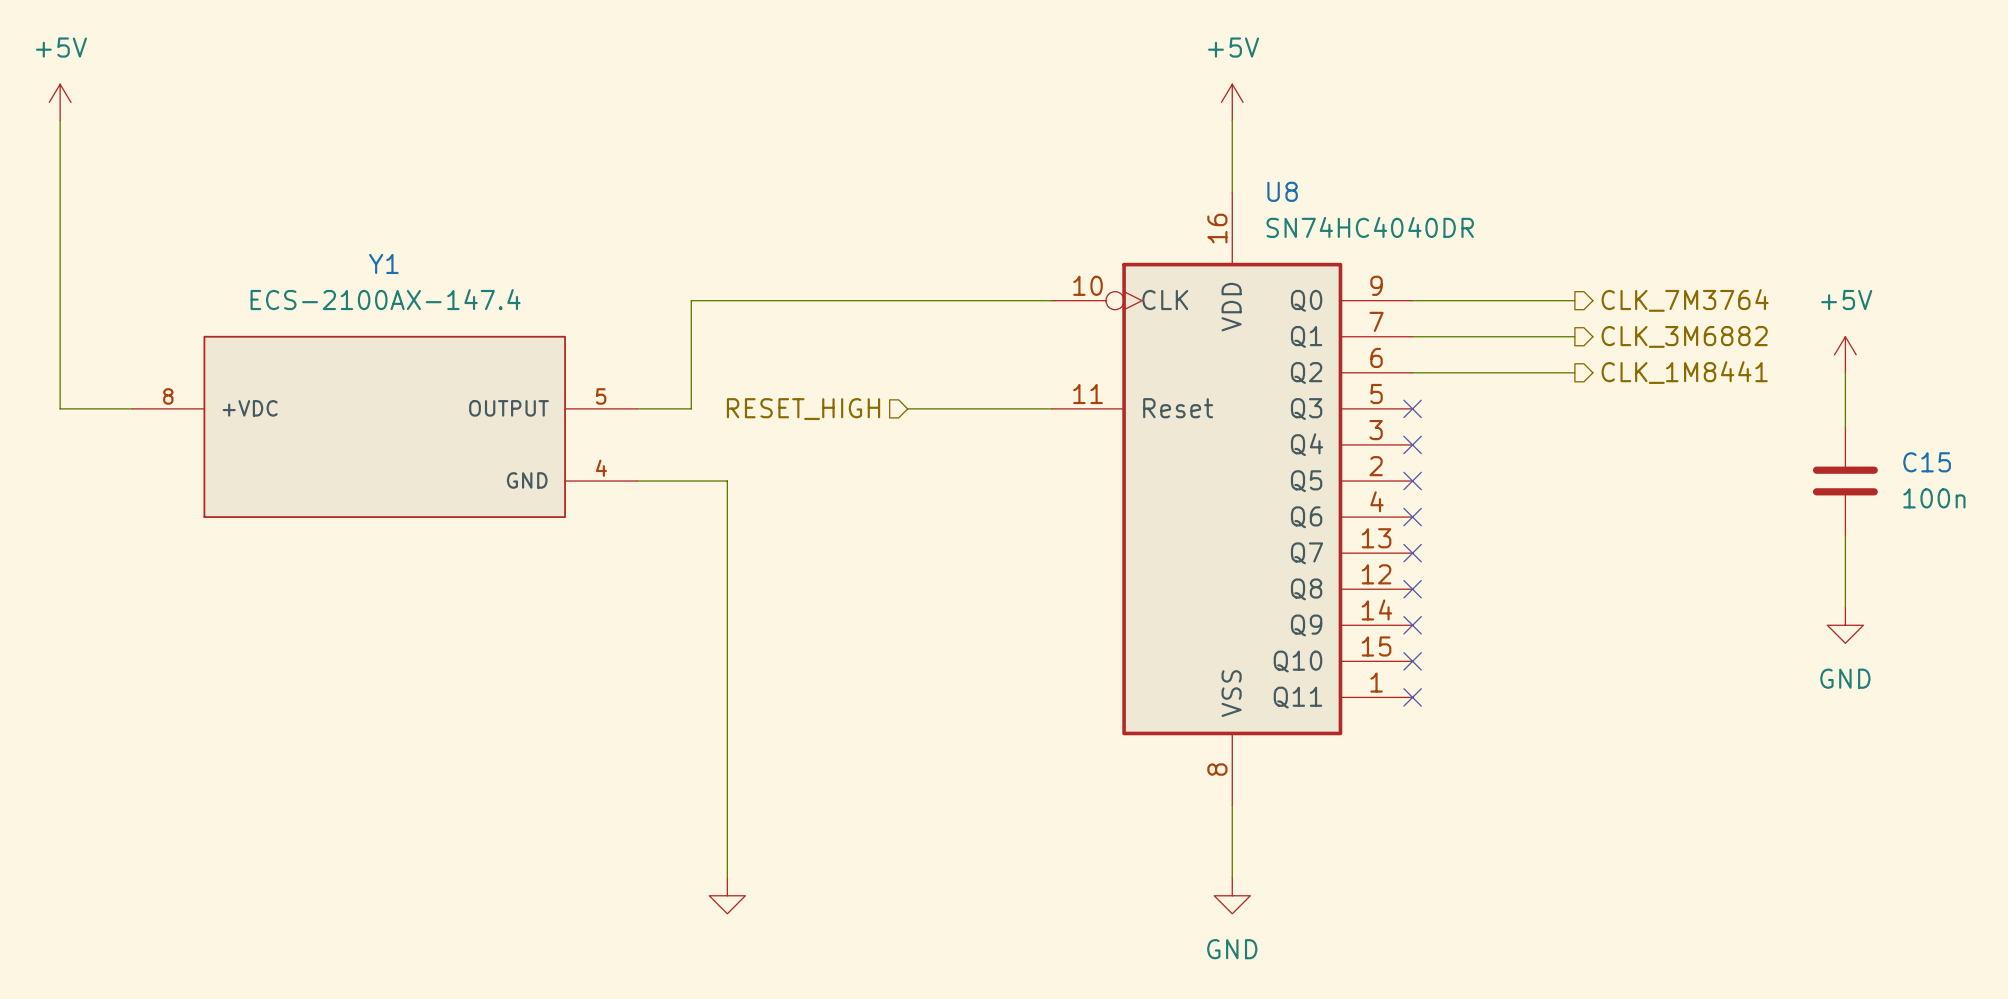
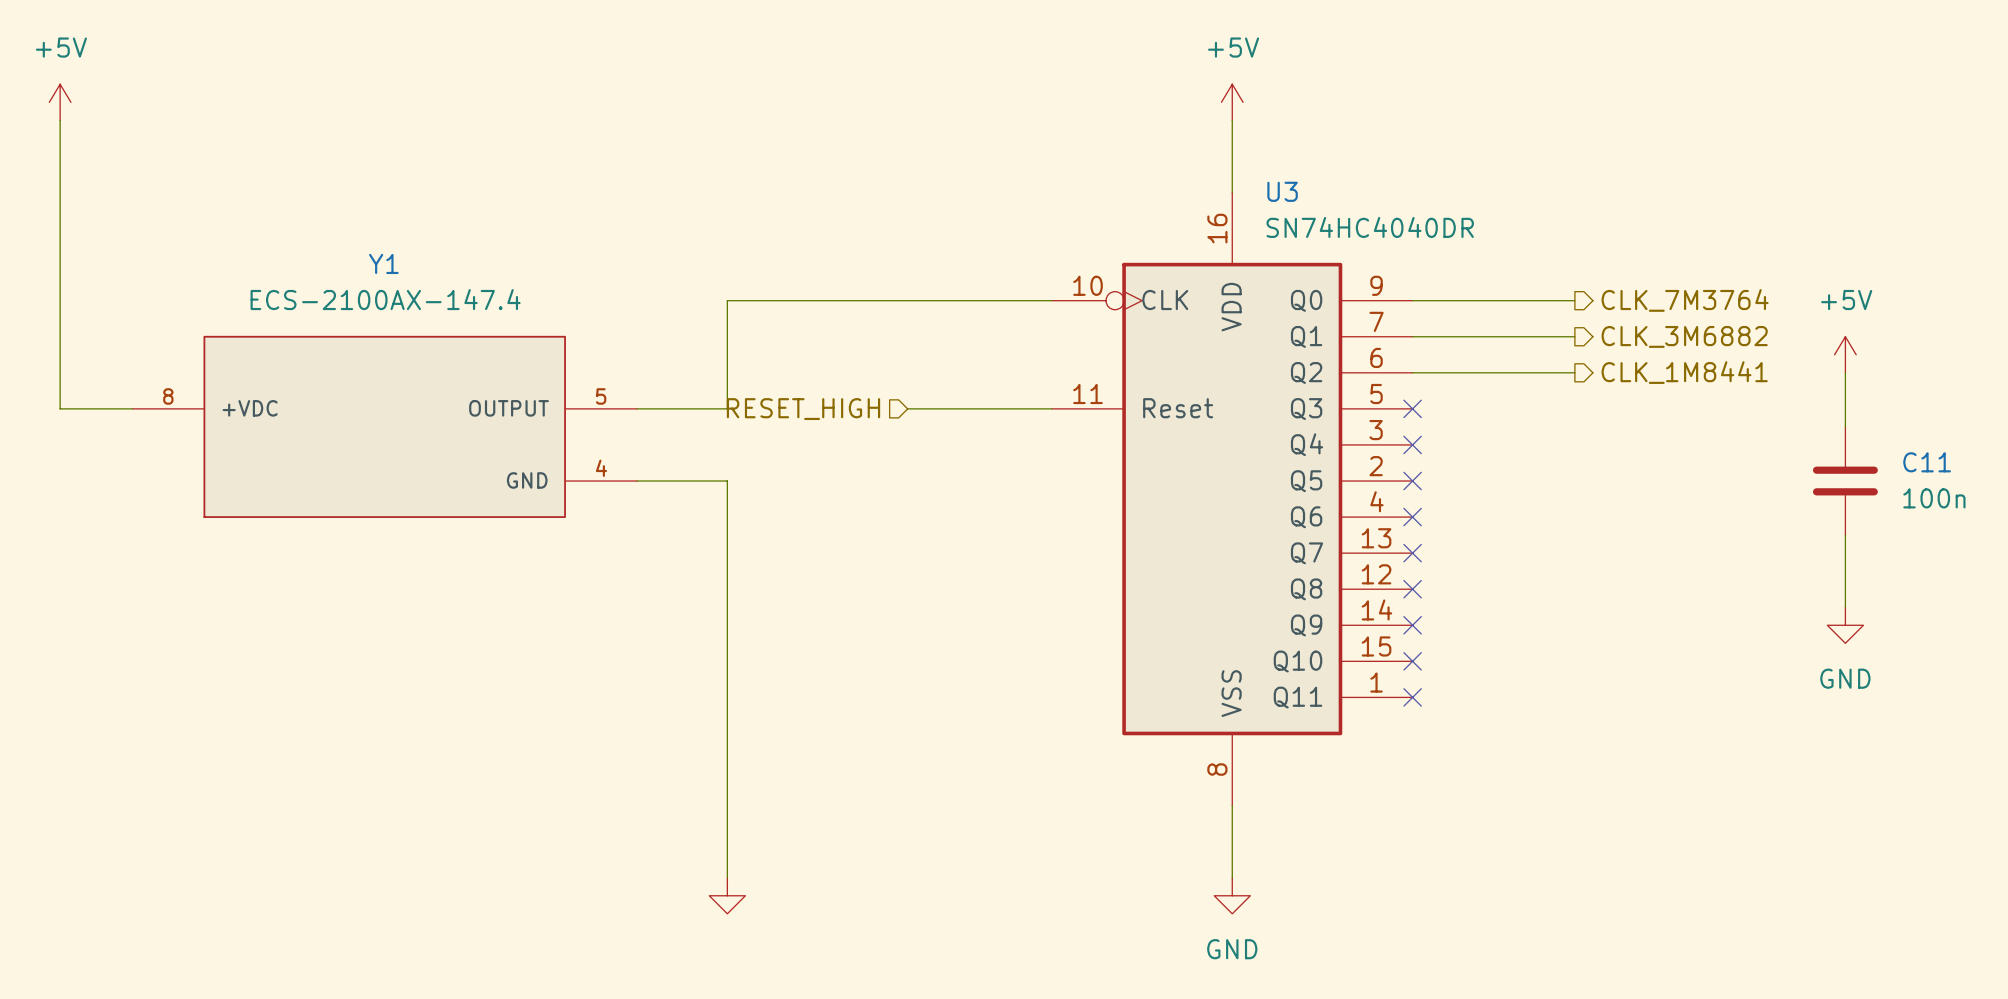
U8 name: U8 (1282, 191) -> U3 (1282, 191)
wire: (727, 300) (691, 300) (691, 408) -> (727, 300) (727, 408) (691, 408)
C15 name: C15 (1927, 462) -> C11 (1927, 462)

